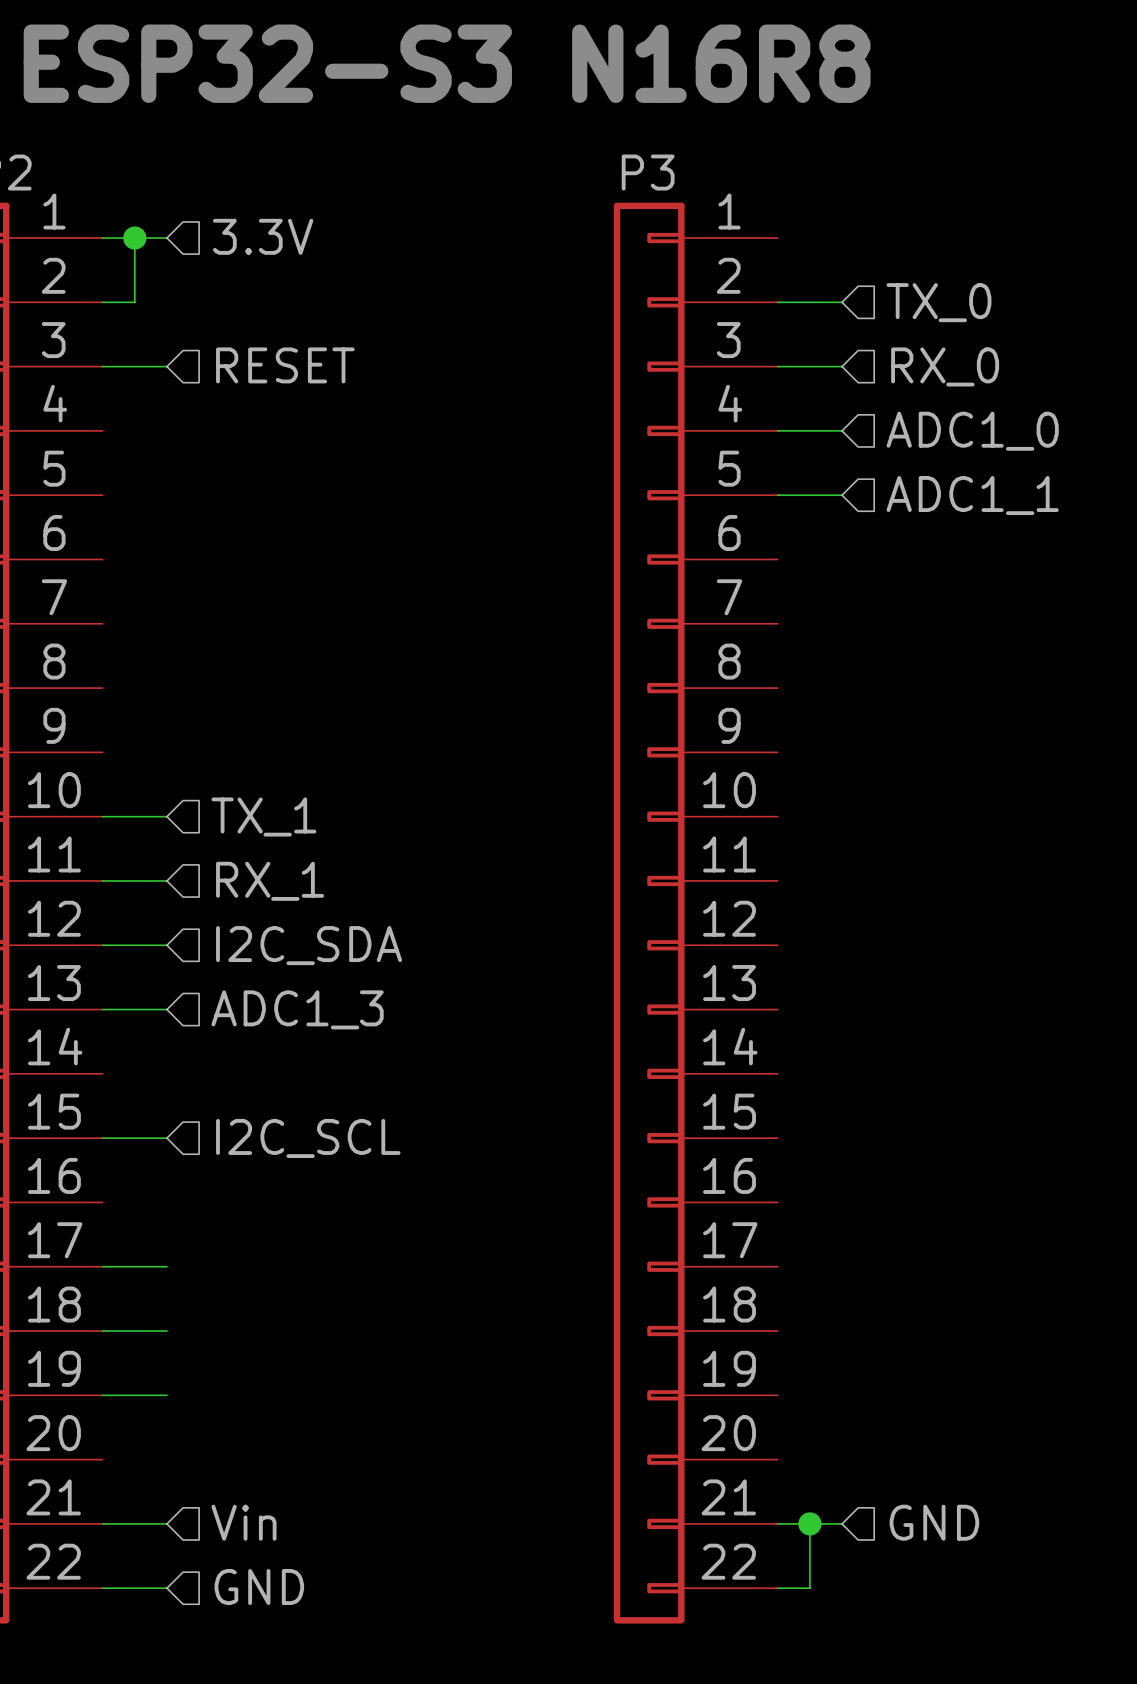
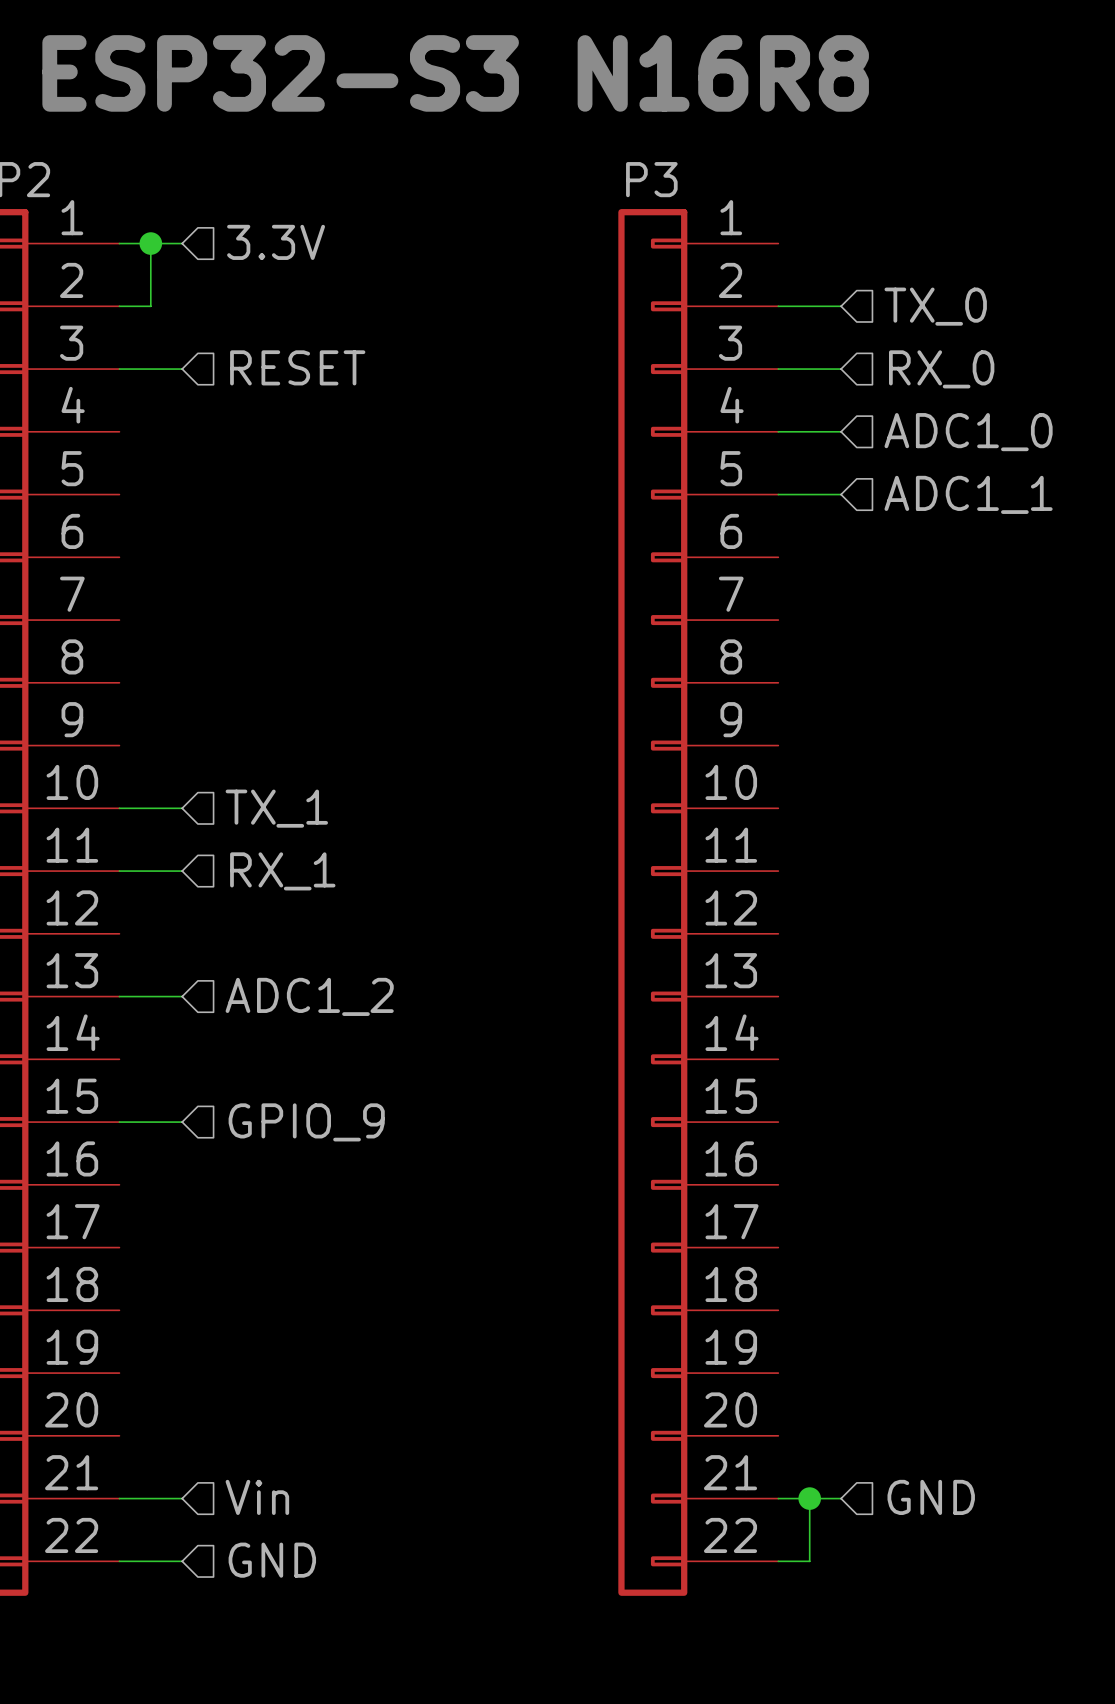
wire: (102, 945) (166, 945) -> none
hierarchical label: I2C_SDA (309, 945) -> none
hierarchical label: ADC1_3 (297, 1009) -> ADC1_2 (309, 996)
hierarchical label: I2C_SCL (308, 1138) -> GPIO_9 (306, 1122)
wire: (102, 1266) (166, 1266) -> none
wire: (102, 1331) (166, 1331) -> none
wire: (102, 1395) (166, 1395) -> none

